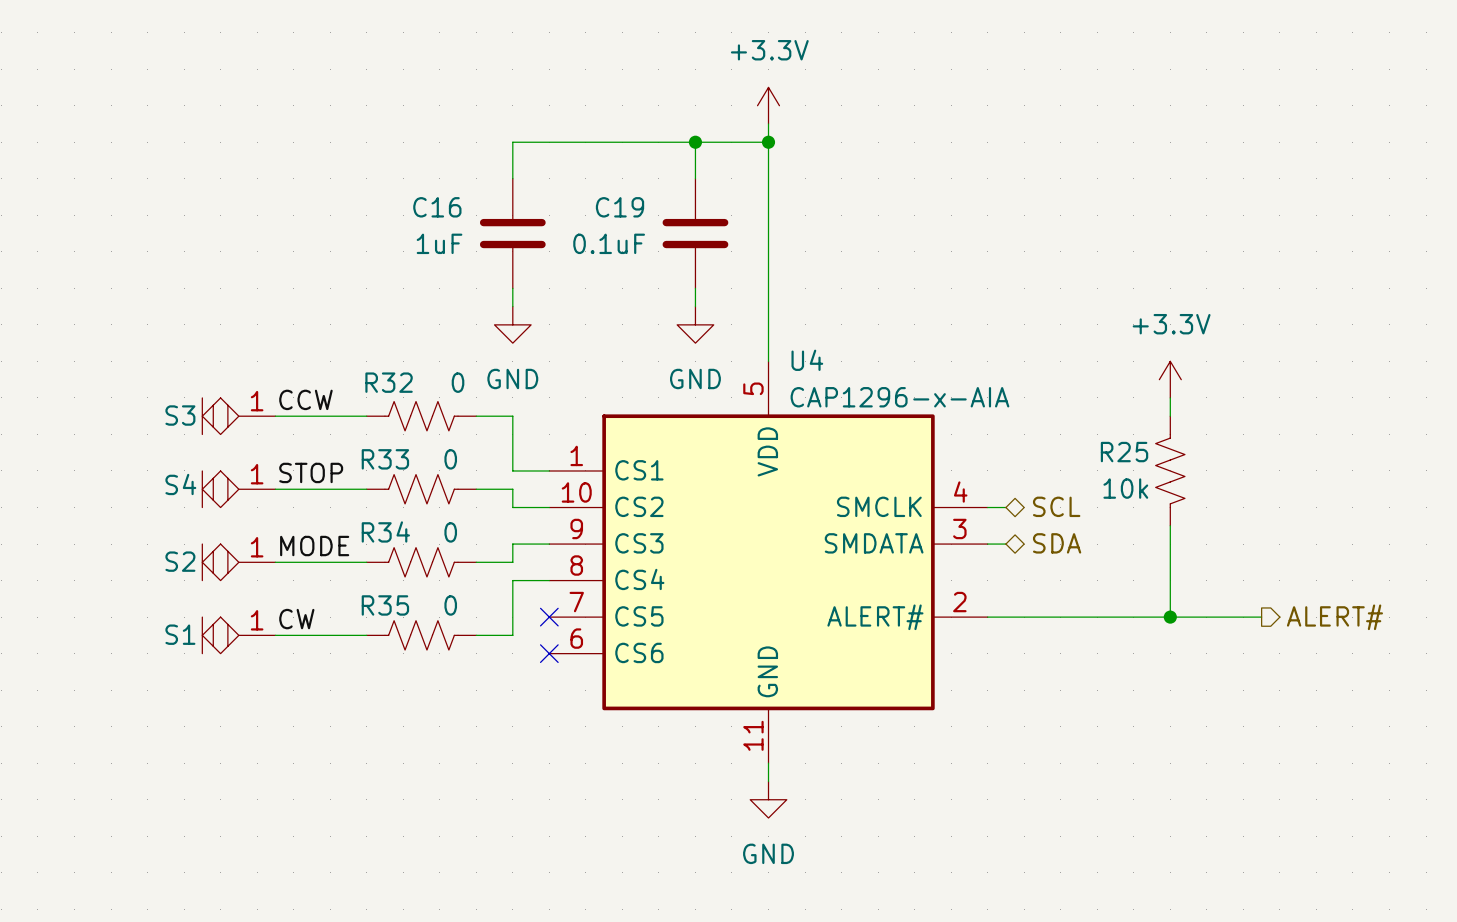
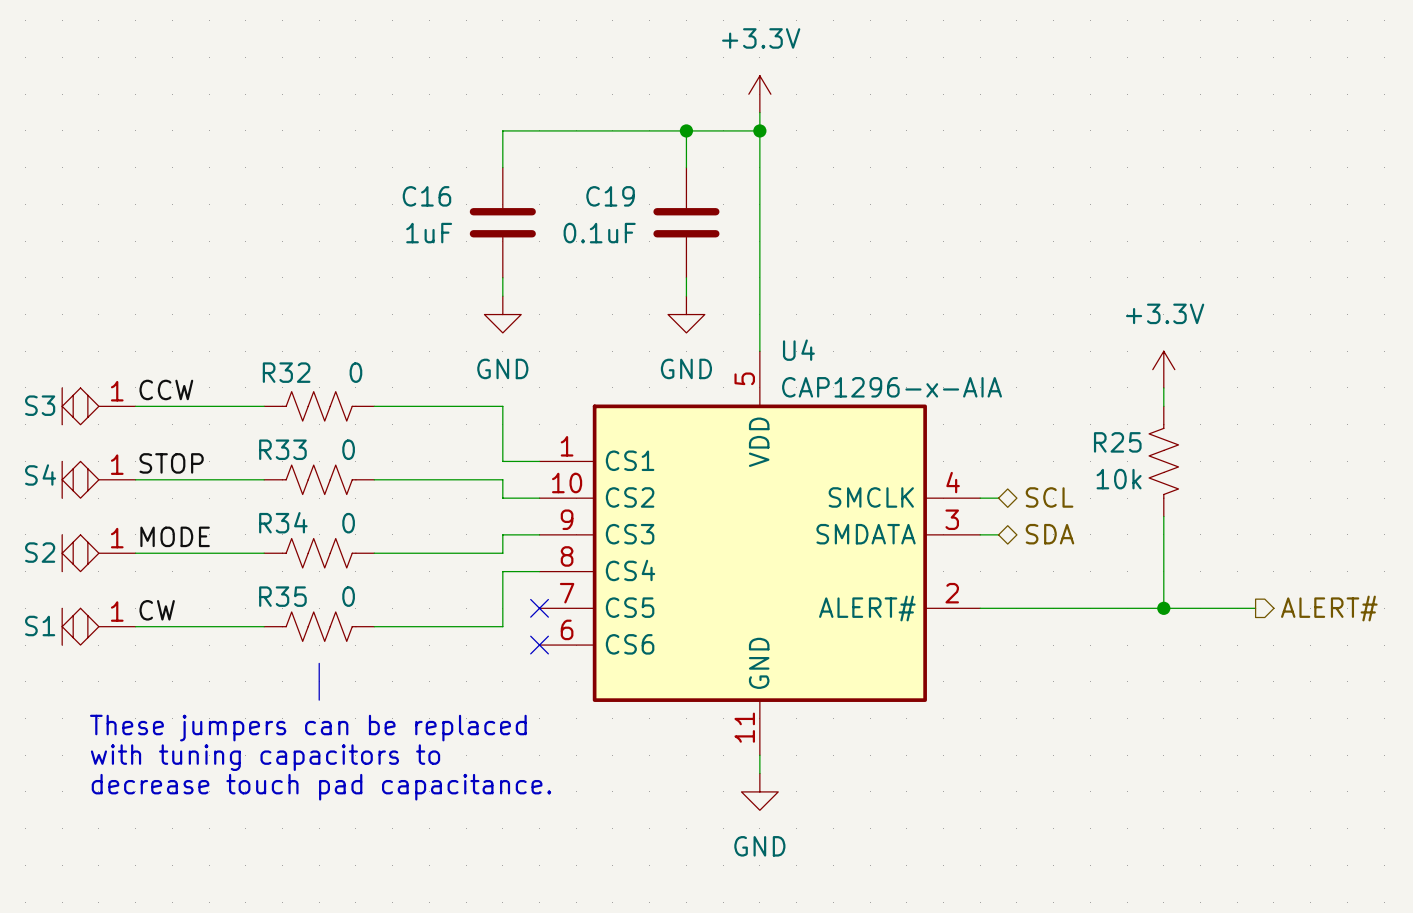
label position: CCW (305, 399) -> CCW (166, 389)
S3 position: (238, 416) -> (98, 406)
wire: (275, 416) (366, 416) -> (264, 406) (135, 406)
wire: none -> (374, 406) (466, 406)
R32 position: (421, 416) -> (319, 406)
label position: STOP (311, 472) -> STOP (171, 463)
S4 position: (238, 489) -> (98, 479)
wire: (275, 489) (366, 489) -> (264, 479) (135, 479)
wire: none -> (374, 479) (466, 479)
R33 position: (421, 489) -> (319, 479)
label position: MODE (314, 546) -> MODE (175, 536)
S2 position: (238, 562) -> (98, 553)
wire: (275, 562) (366, 562) -> (264, 553) (135, 553)
wire: none -> (374, 553) (466, 553)
R34 position: (421, 562) -> (319, 553)
label position: CW (296, 619) -> CW (157, 610)
S1 position: (238, 635) -> (98, 626)
wire: (275, 635) (366, 635) -> (264, 626) (135, 626)
wire: none -> (374, 626) (466, 626)
R35 position: (421, 635) -> (319, 626)
line: none -> (319, 663) (319, 700)
text: none -> These jumpers can be replaced (308, 728)
text: none -> with tuning capacitors to (265, 757)
text: none -> decrease touch pad capacitance. (321, 787)

